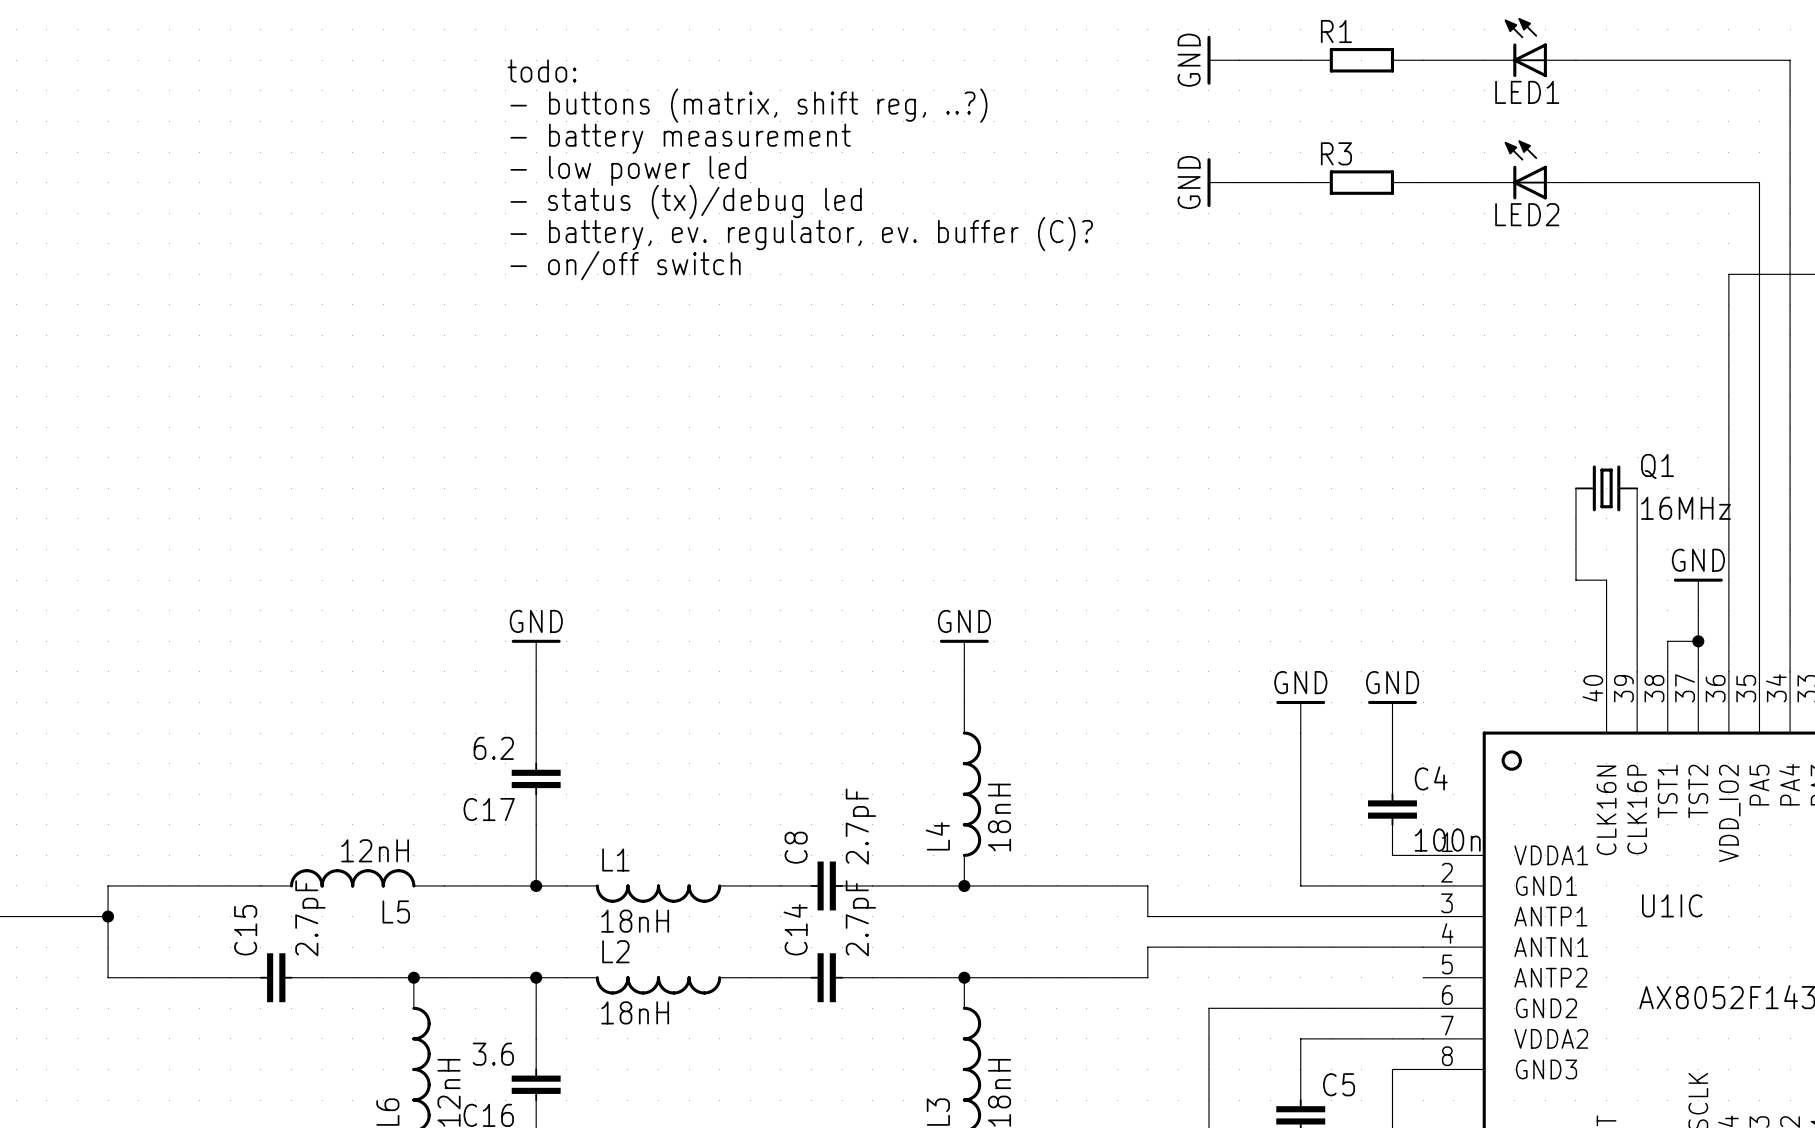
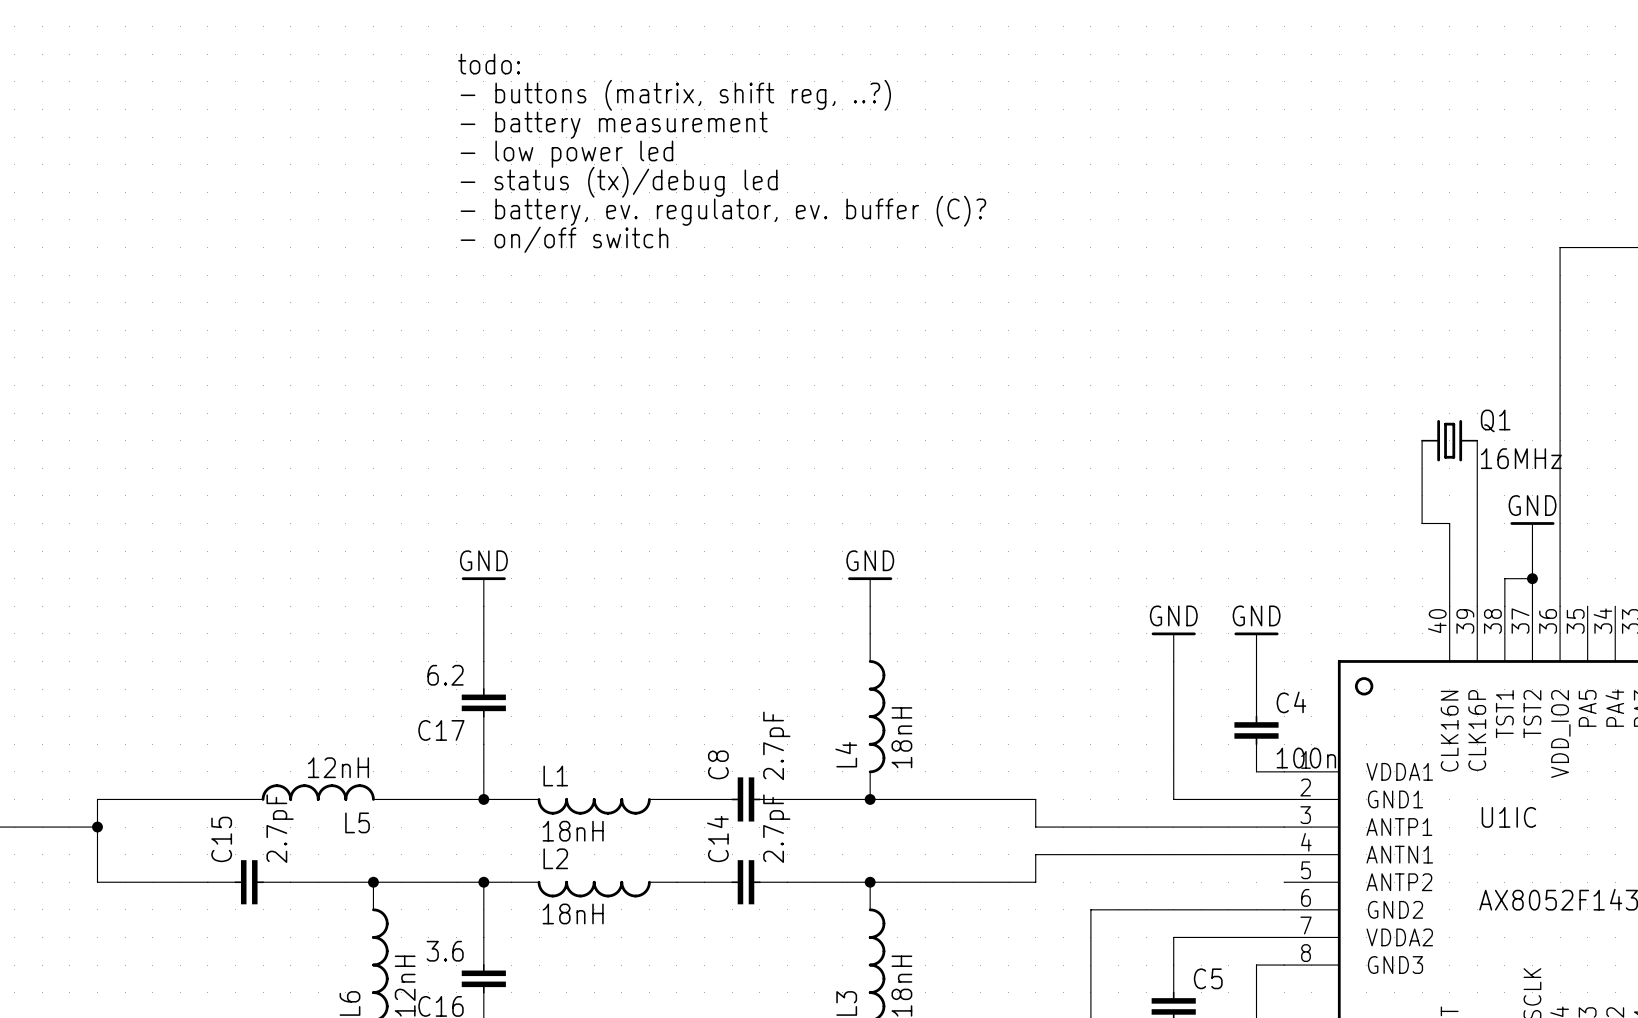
LED1: (1530, 47) -> none
power symbol: GND (1223, 60) -> none
wire: (1239, 60) (1300, 60) -> none
R1: (1361, 60) -> none
wire: (1423, 60) (1484, 60) -> none
wire: (1575, 60) (1790, 60) (1790, 671) -> none
LED2: (1530, 169) -> none
power symbol: GND (1223, 182) -> none
wire: (1239, 182) (1300, 182) -> none
R3: (1361, 182) -> none
wire: (1423, 182) (1484, 182) -> none
wire: (1575, 182) (1759, 182) (1759, 671) -> none

